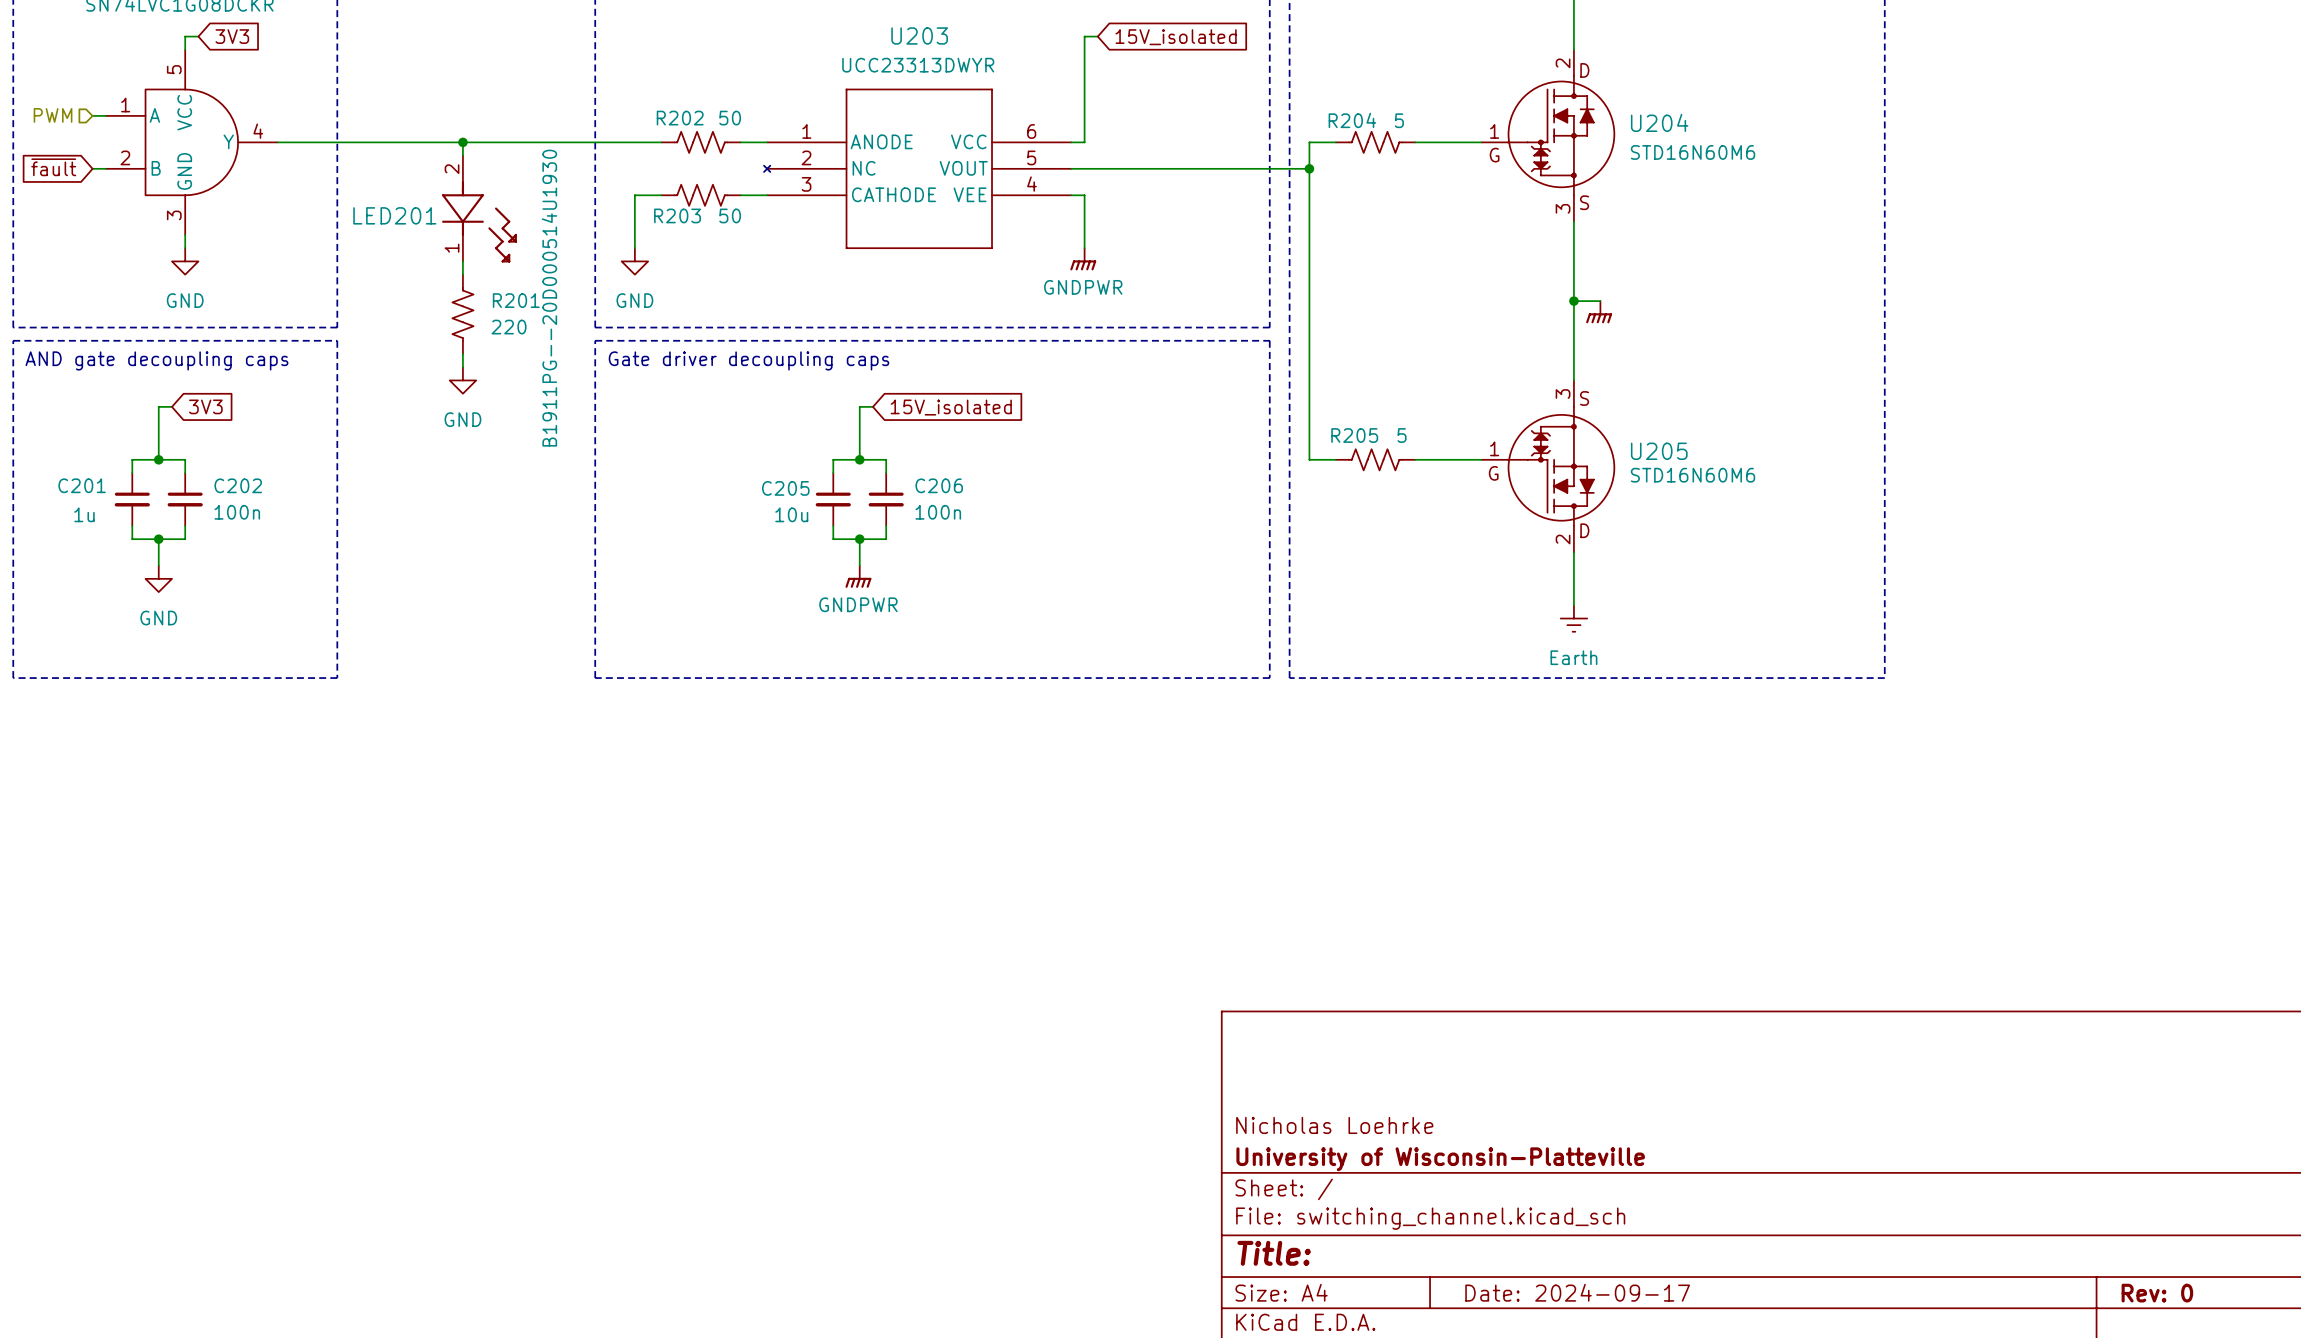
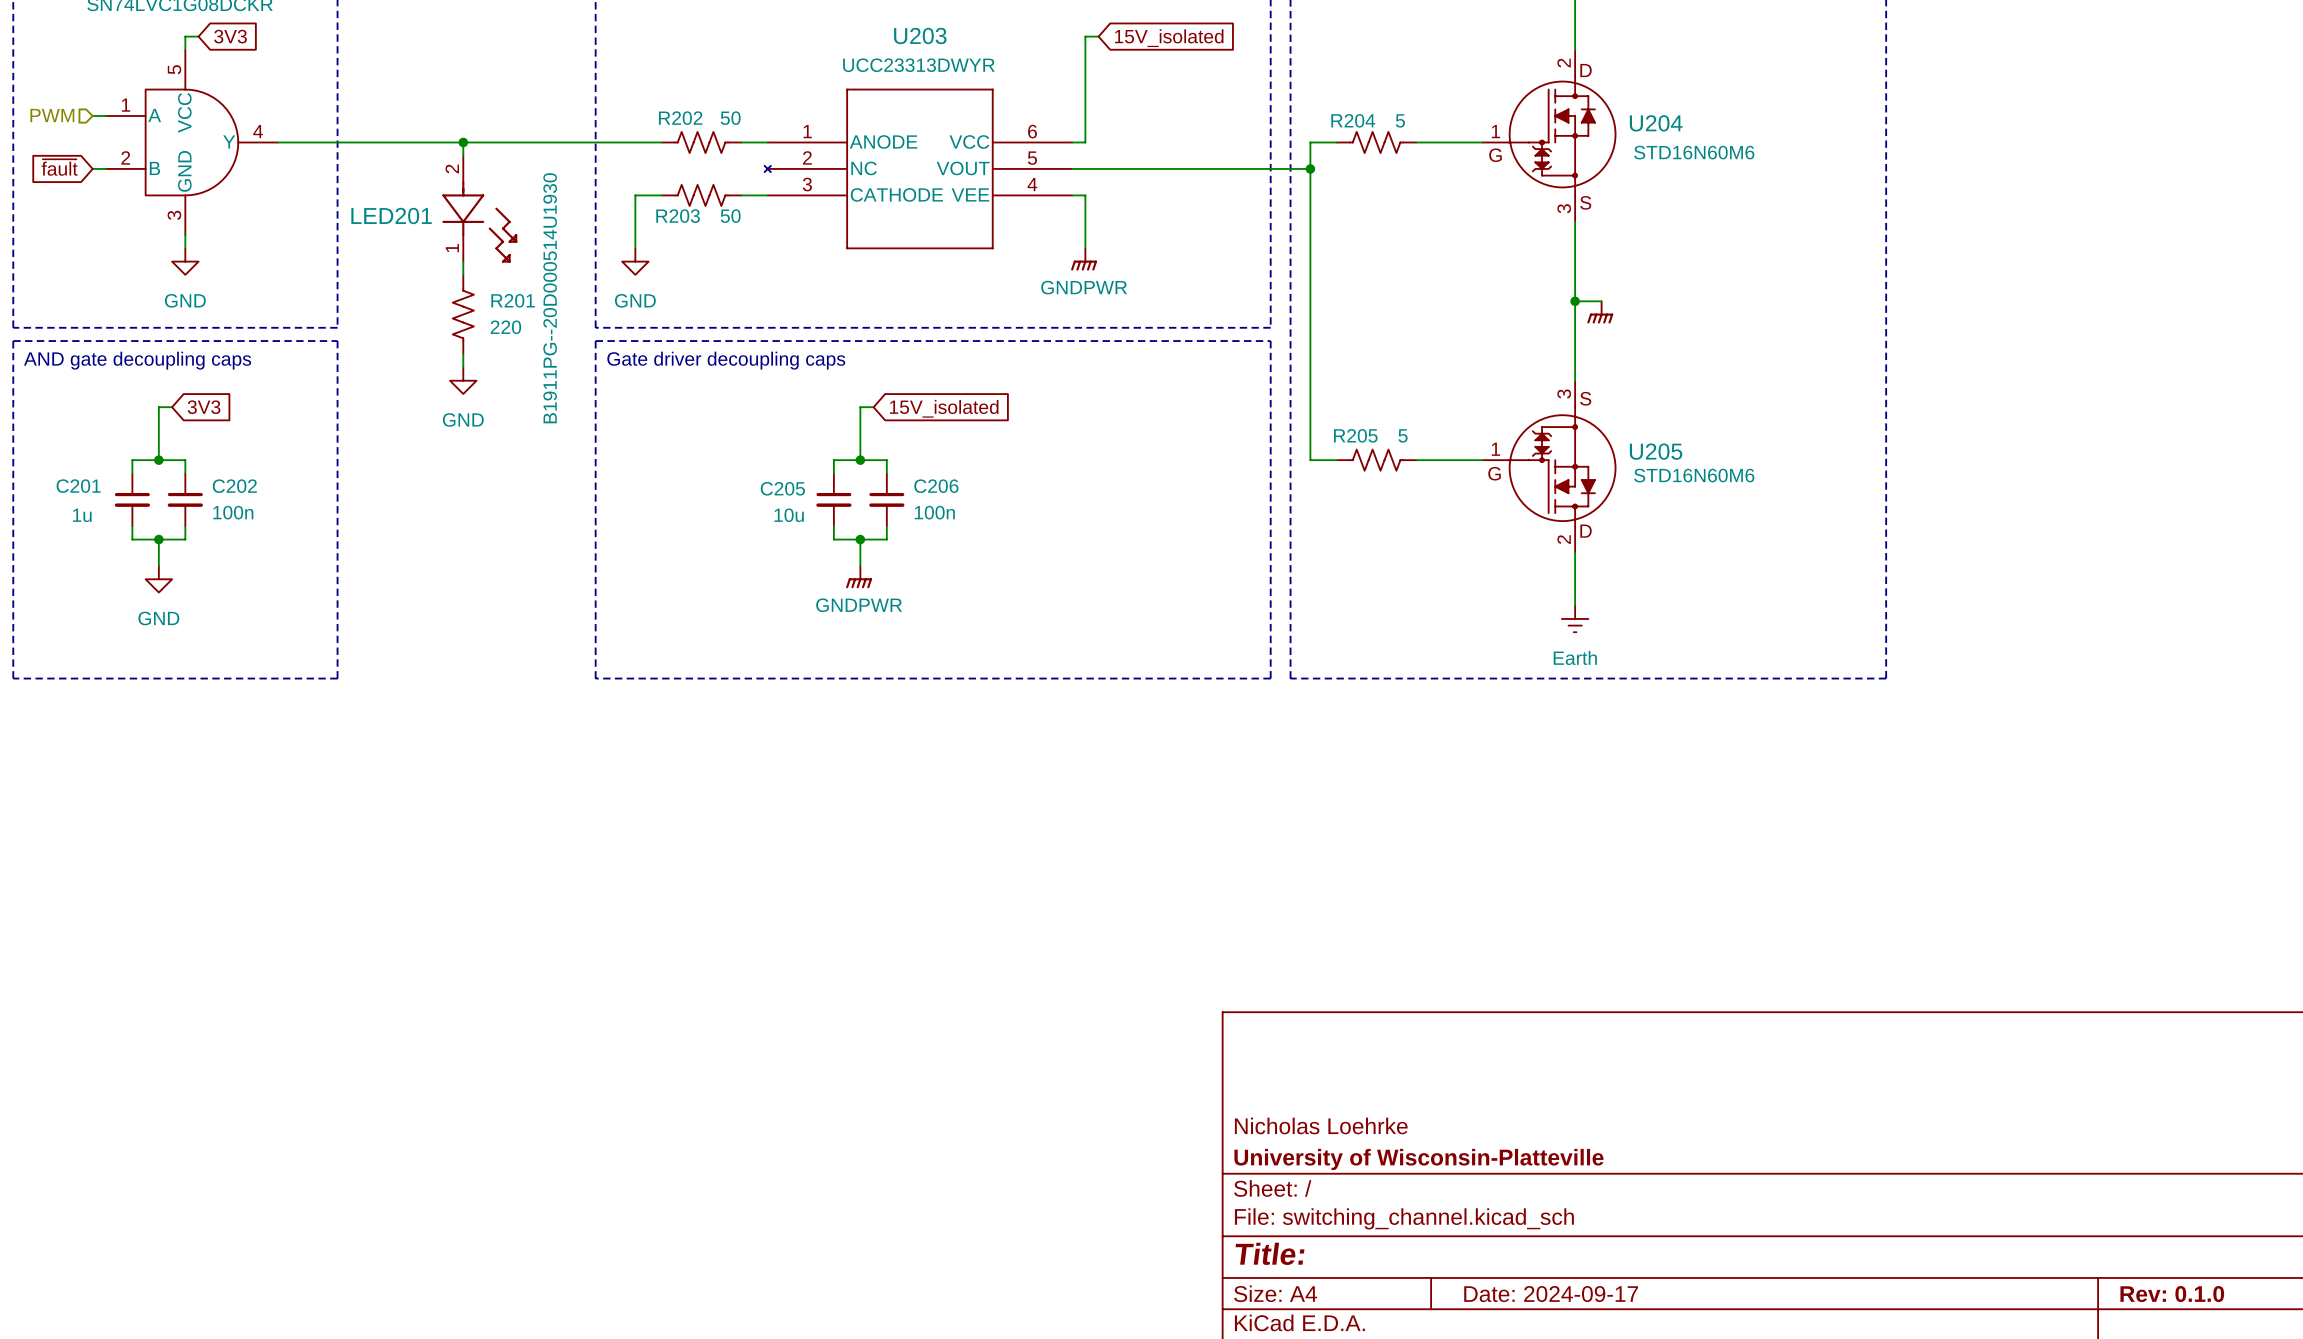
title block: Rev: 0 (2157, 1293) -> Rev: 0.1.0 (2172, 1294)

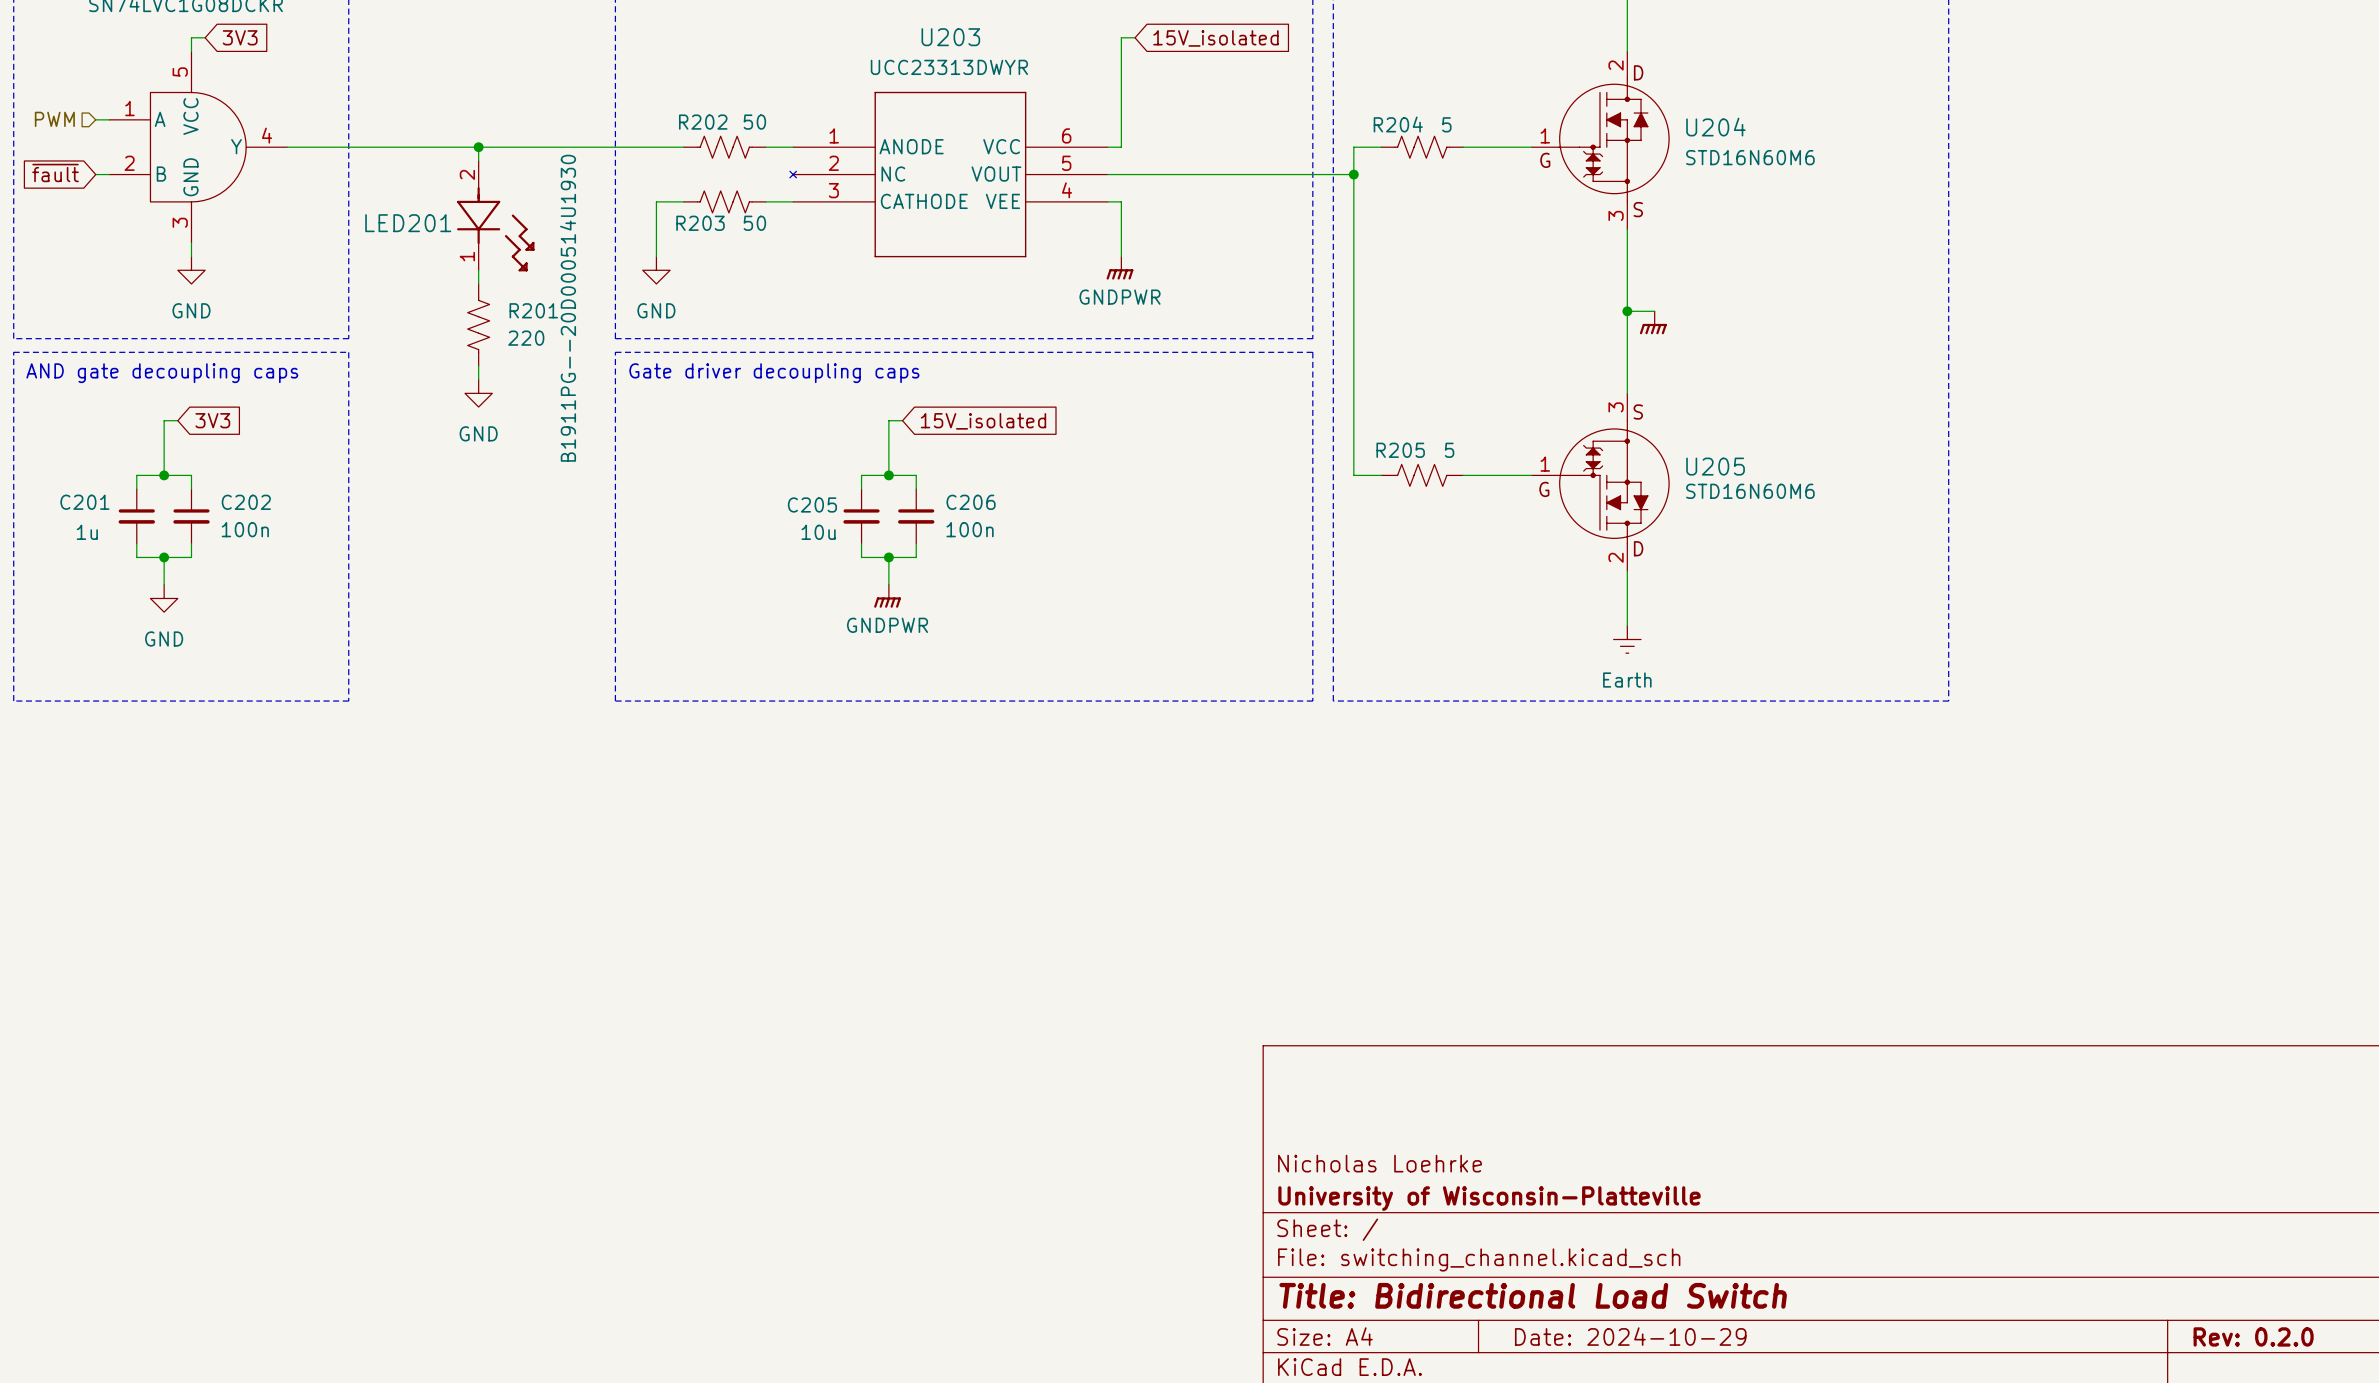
title block: Title: (1270, 1253) -> Title: Bidirectional Load Switch (1533, 1295)
title block: Date: 2024-09-17 (1551, 1294) -> Date: 2024-10-29 (1630, 1336)
title block: Rev: 0.1.0 (2172, 1294) -> Rev: 0.2.0 (2253, 1336)

